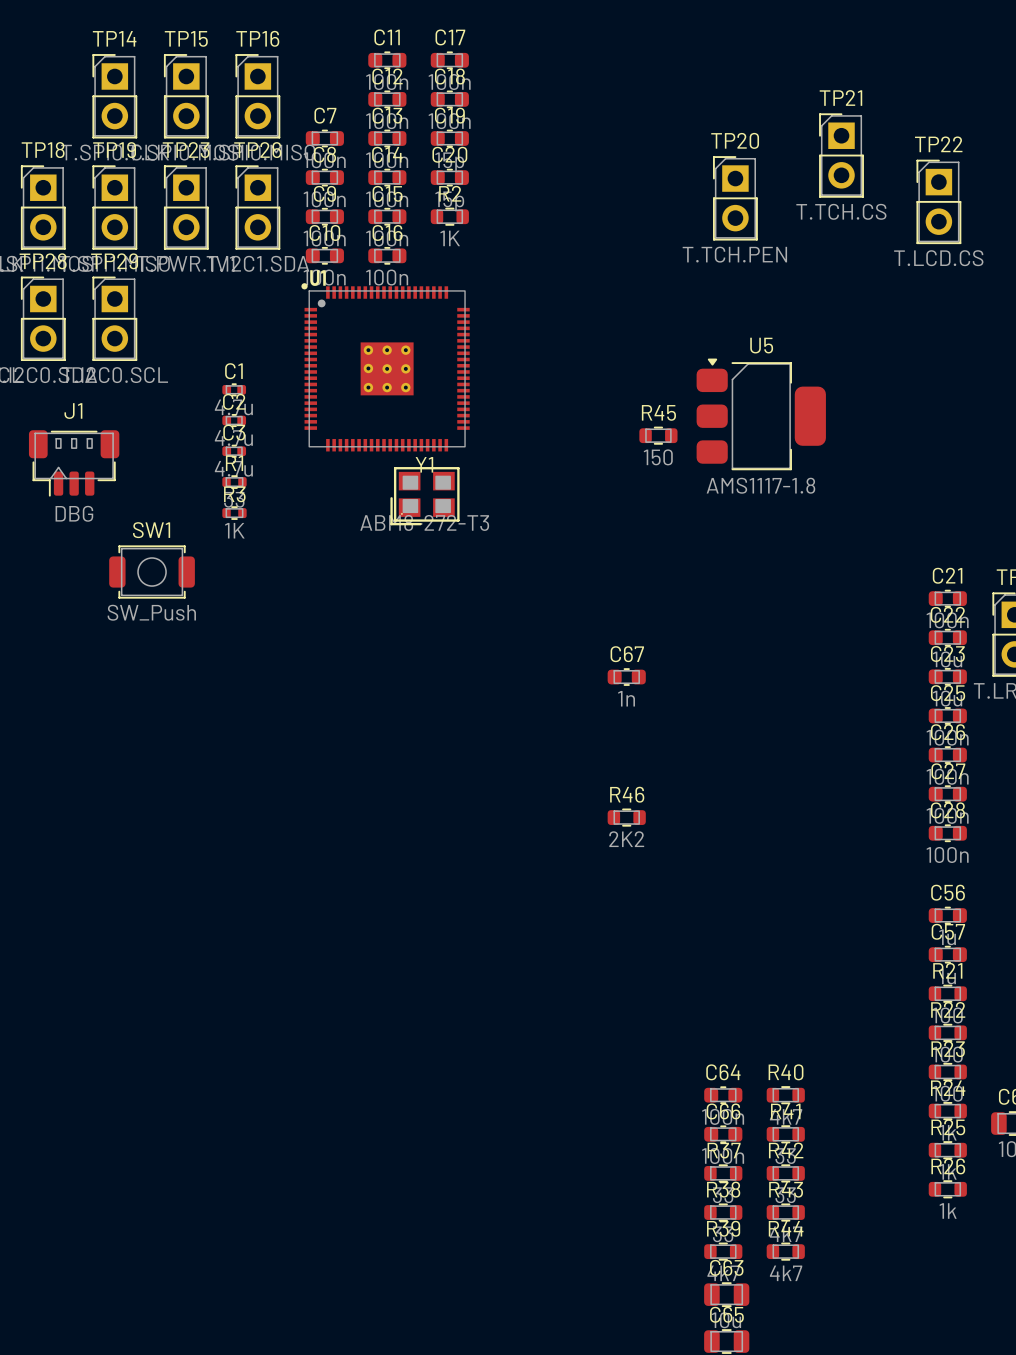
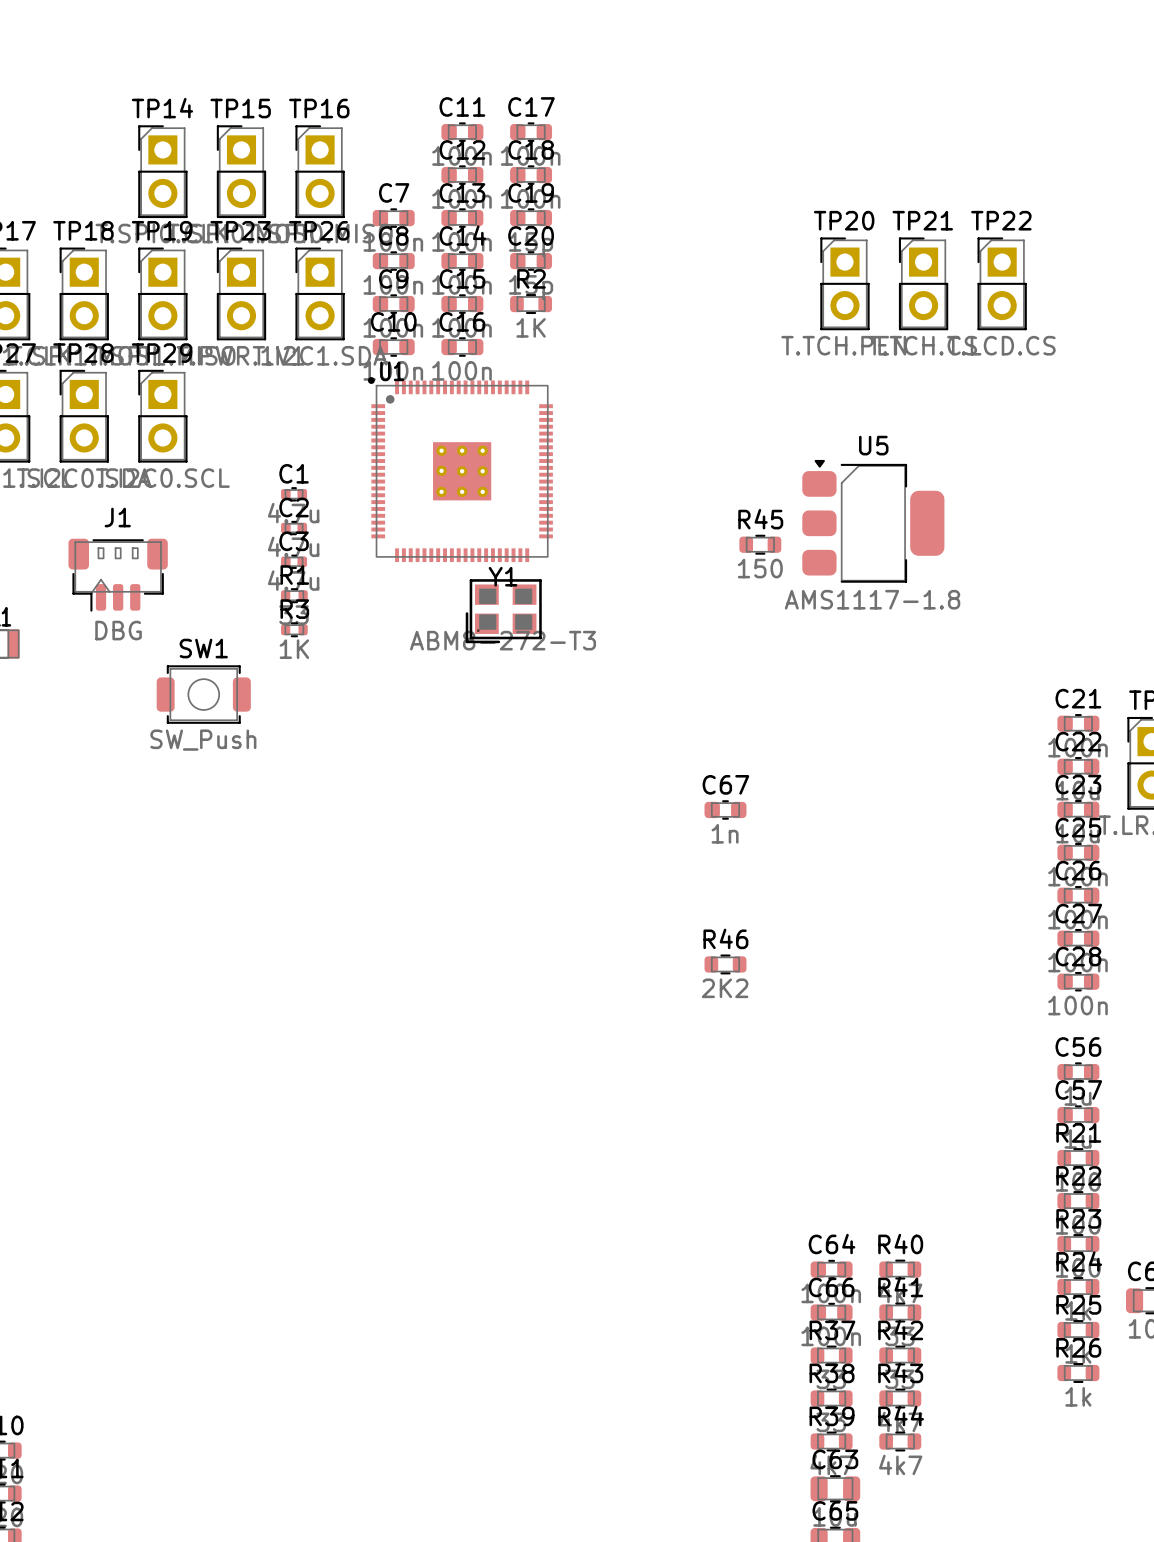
TP21 position: (841, 155) -> (923, 283)
TP22 position: (938, 201) -> (1002, 283)

